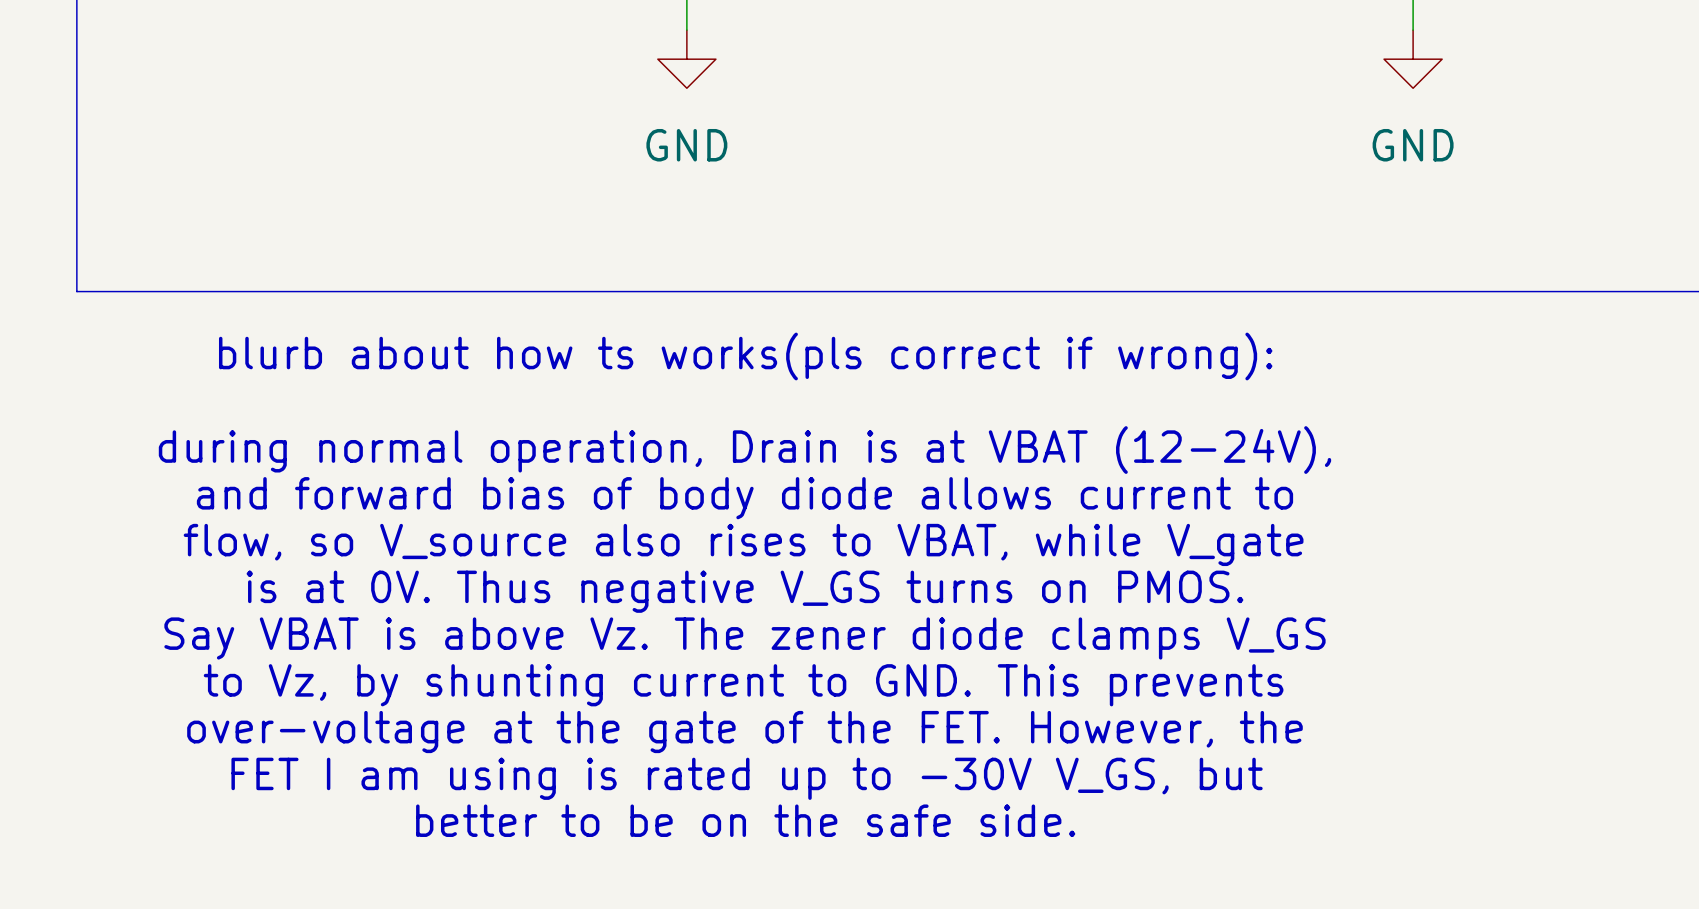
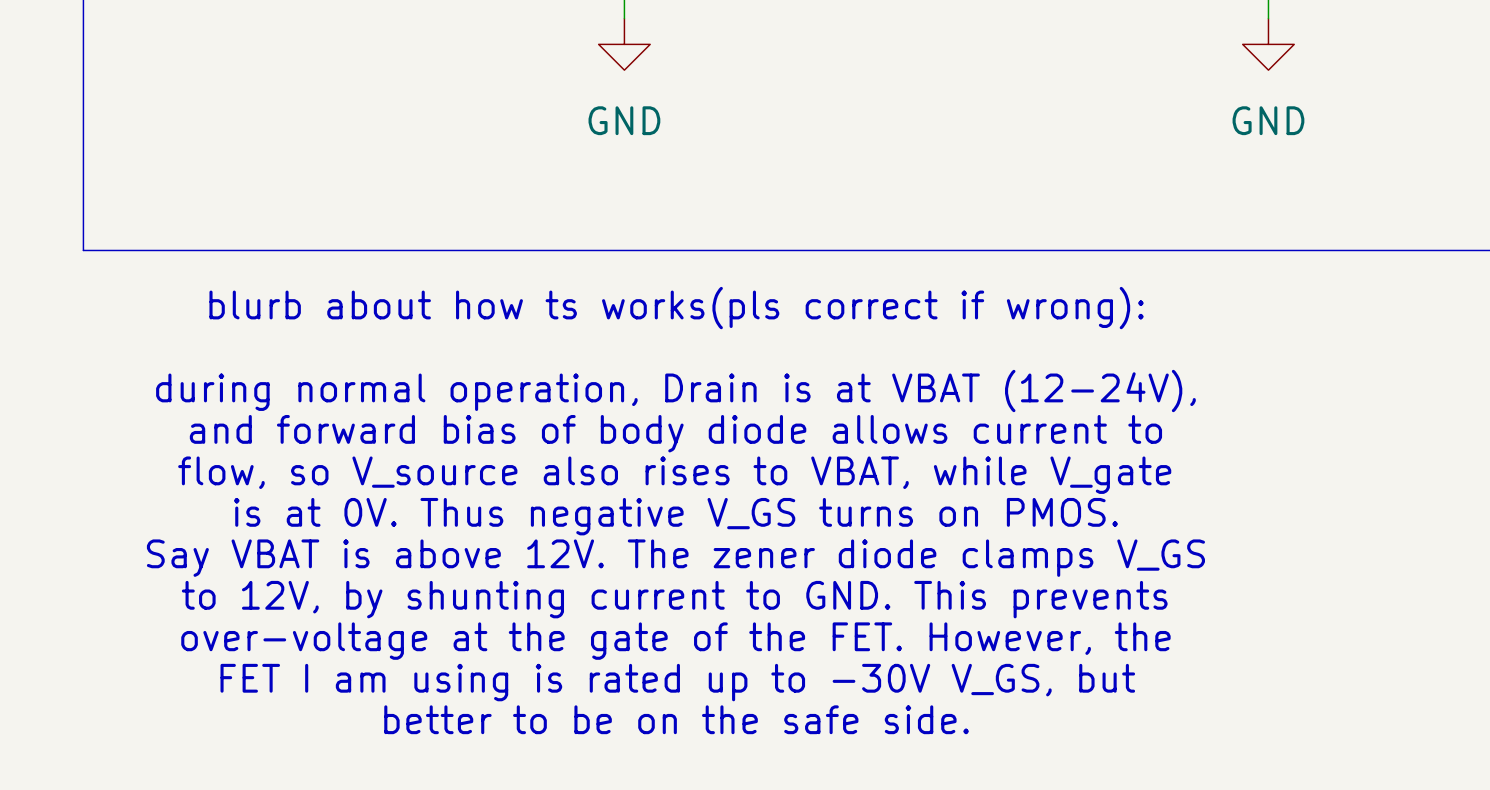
text: Say VBAT is above Vz. The zener diode clamps V_GS (744, 638) -> Say VBAT is above 12V. The zener diode clamps V_GS (675, 558)
text: to Vz, by shunting current to GND. This prevents (743, 685) -> to 12V, by shunting current to GND. This prevents (674, 599)

